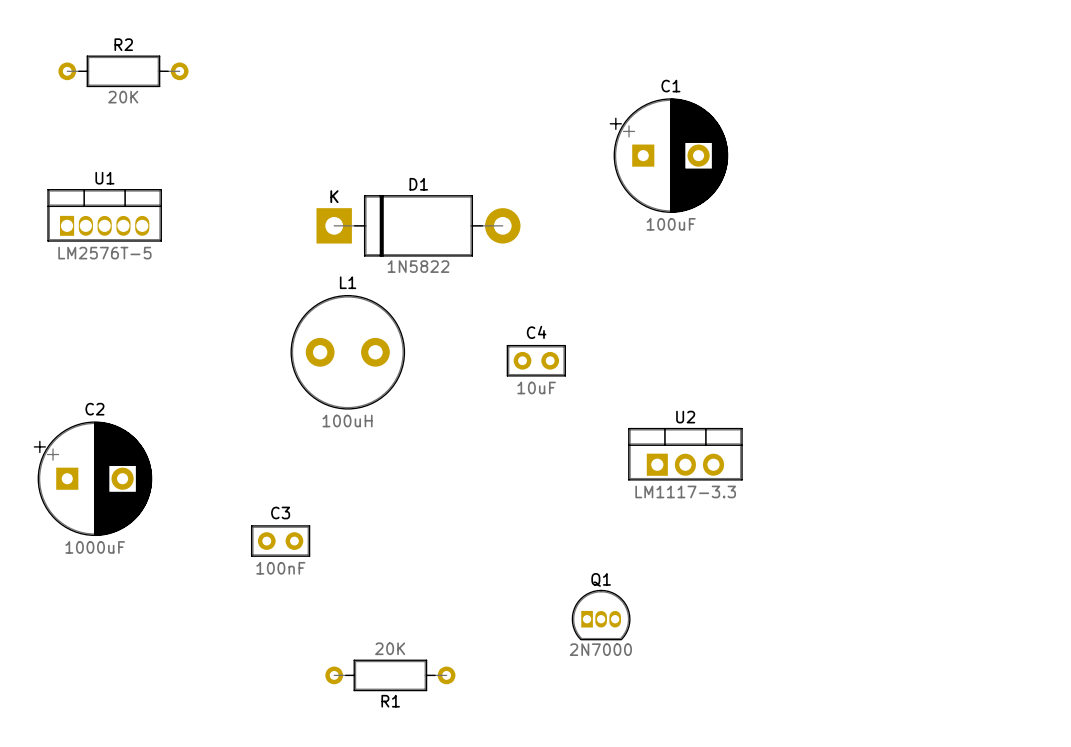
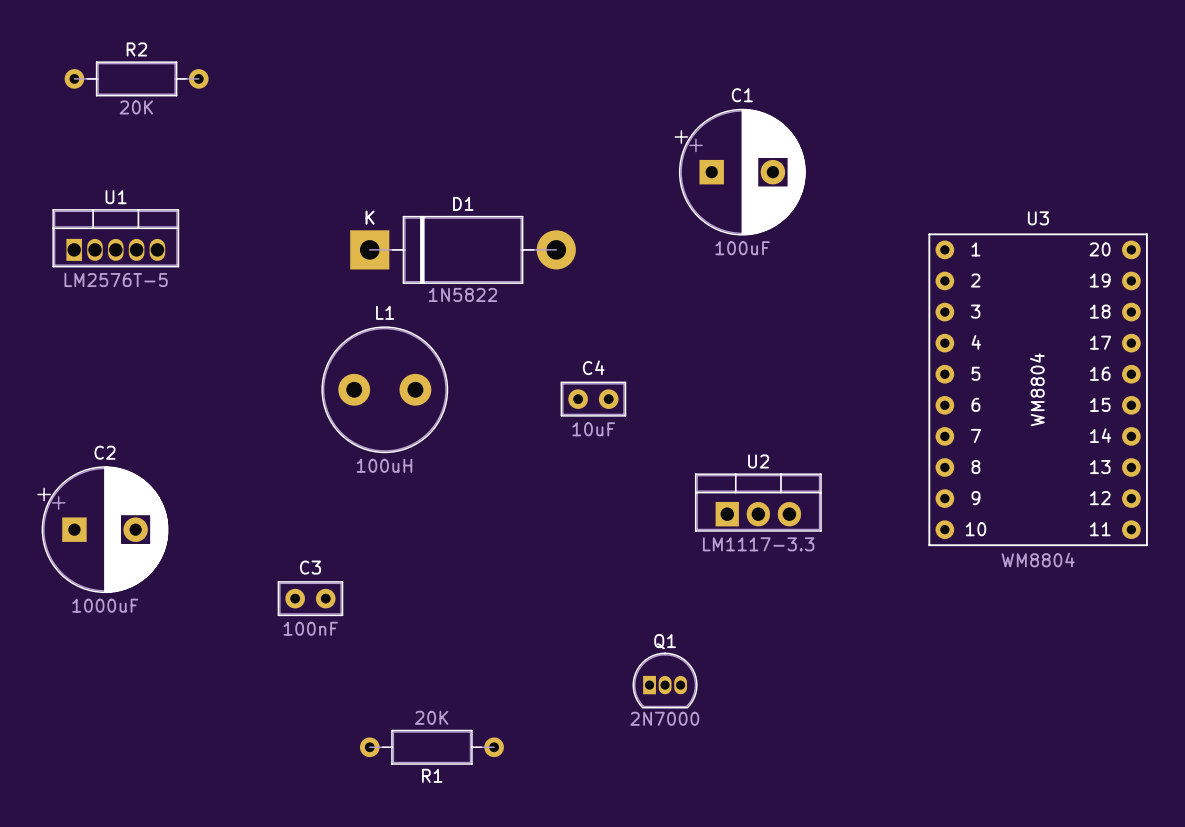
U3: none -> WM8804 (1038, 389)

